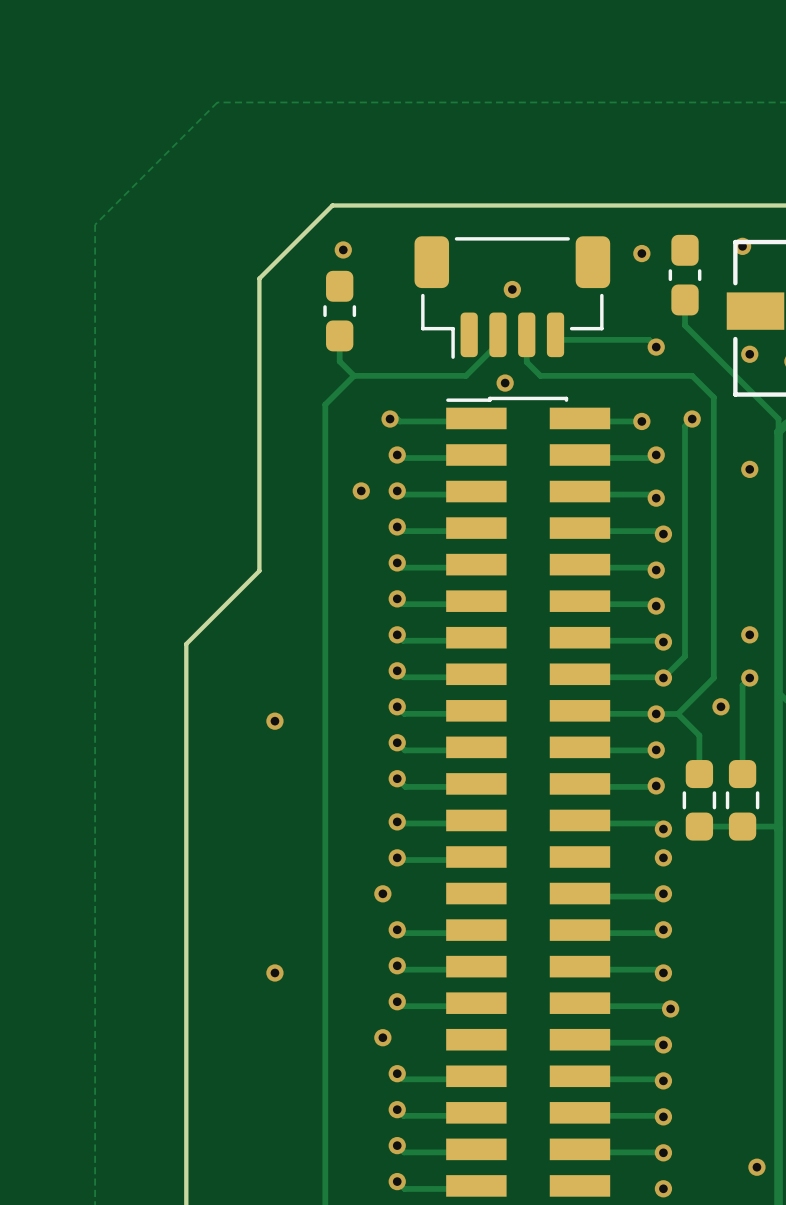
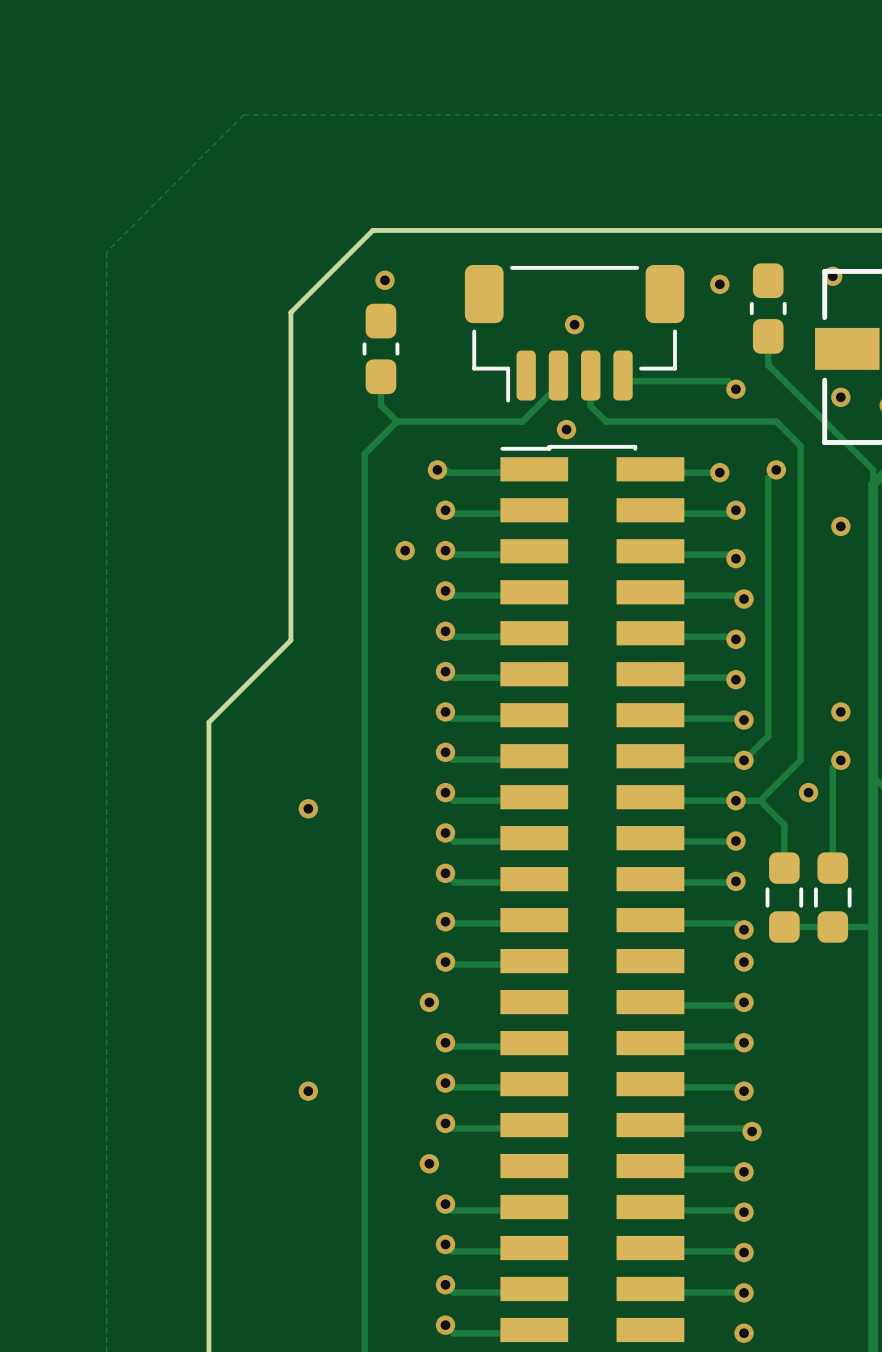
via: (756, 1167) -> none

